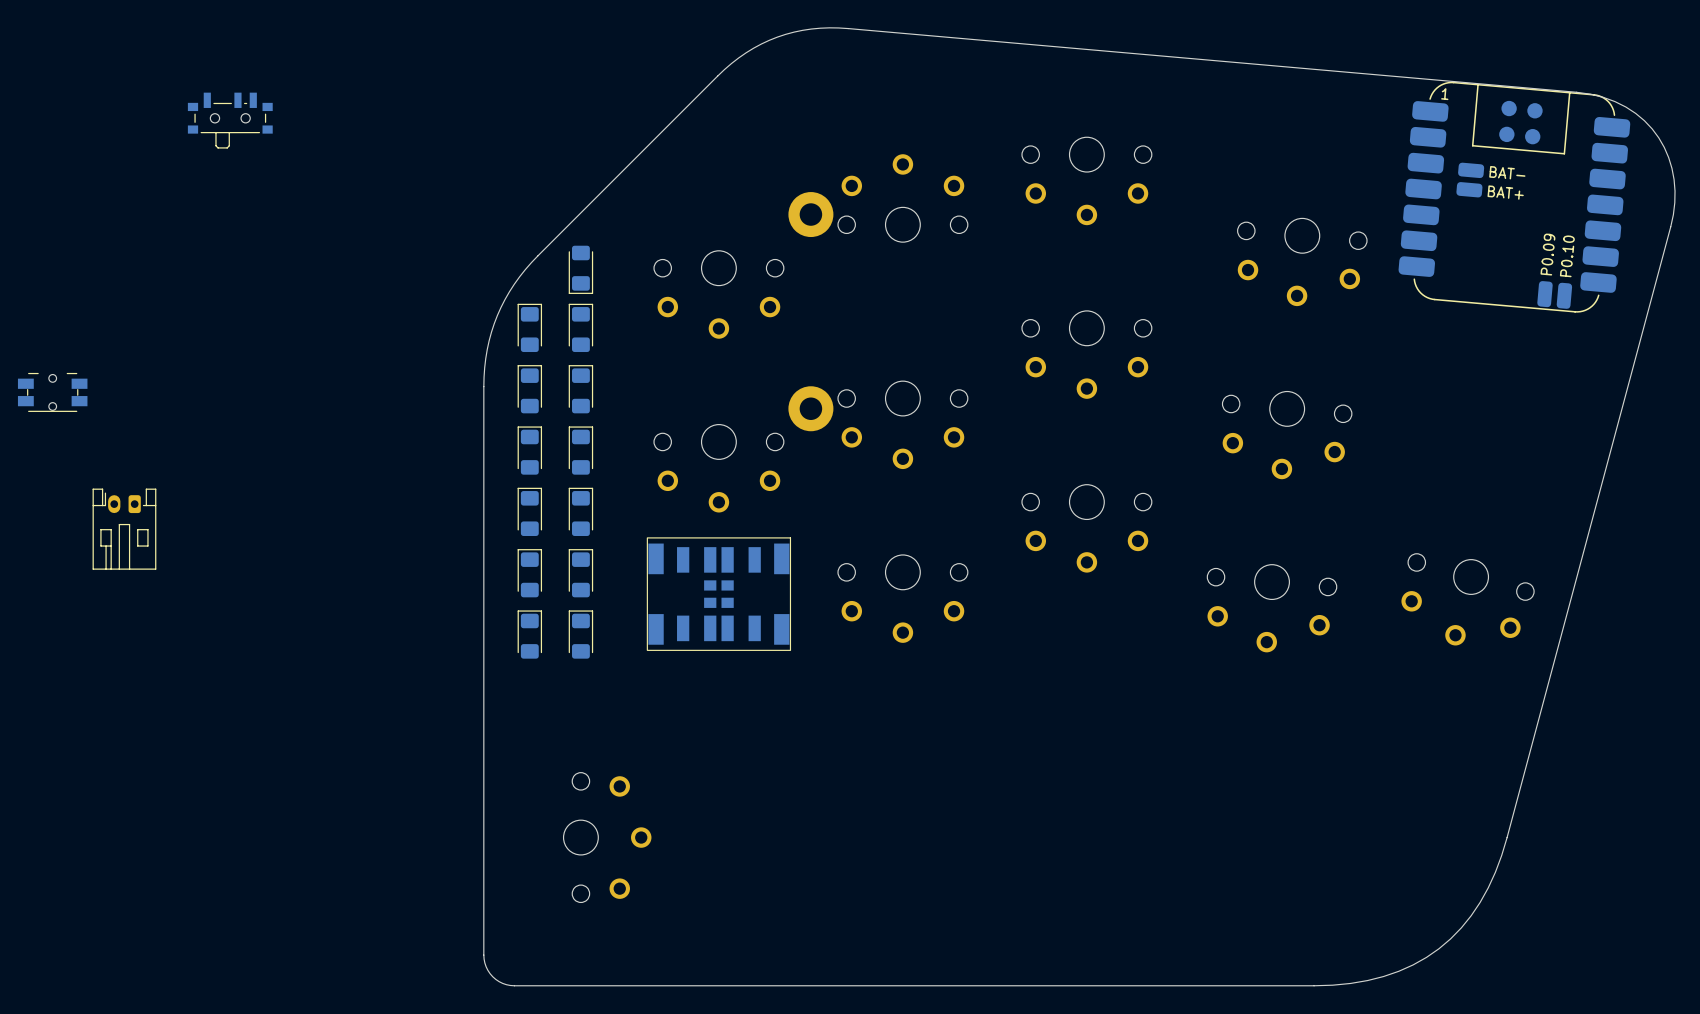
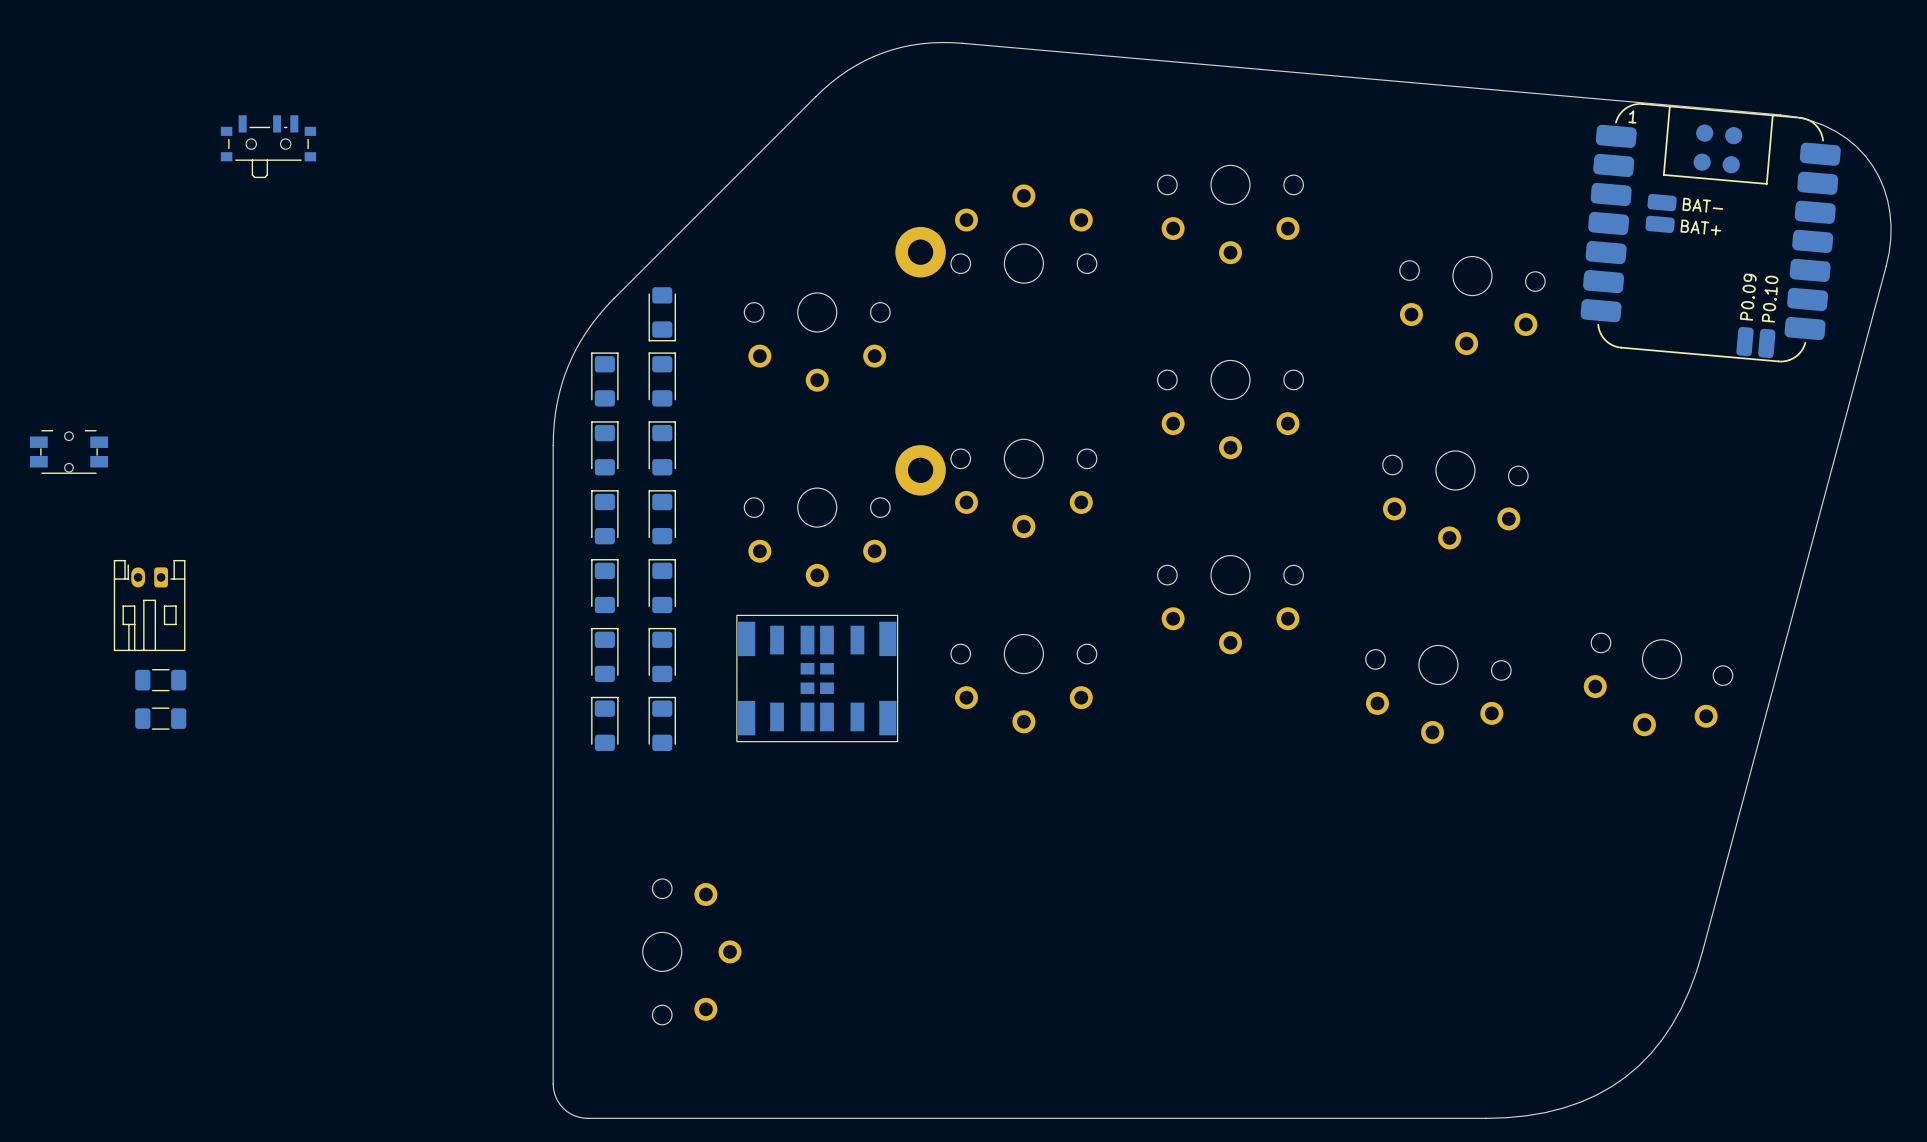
part: none -> (160, 680)
part: none -> (160, 718)

